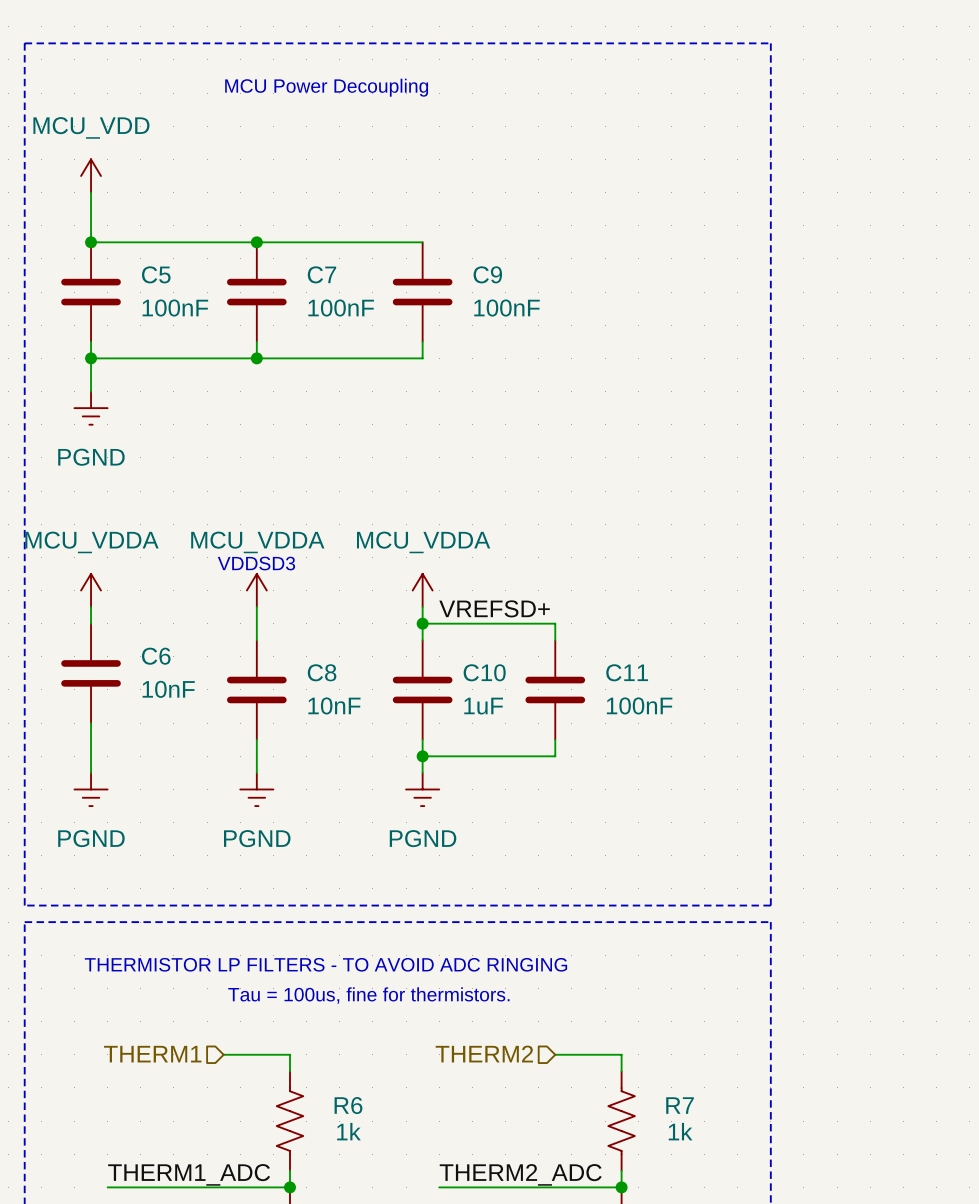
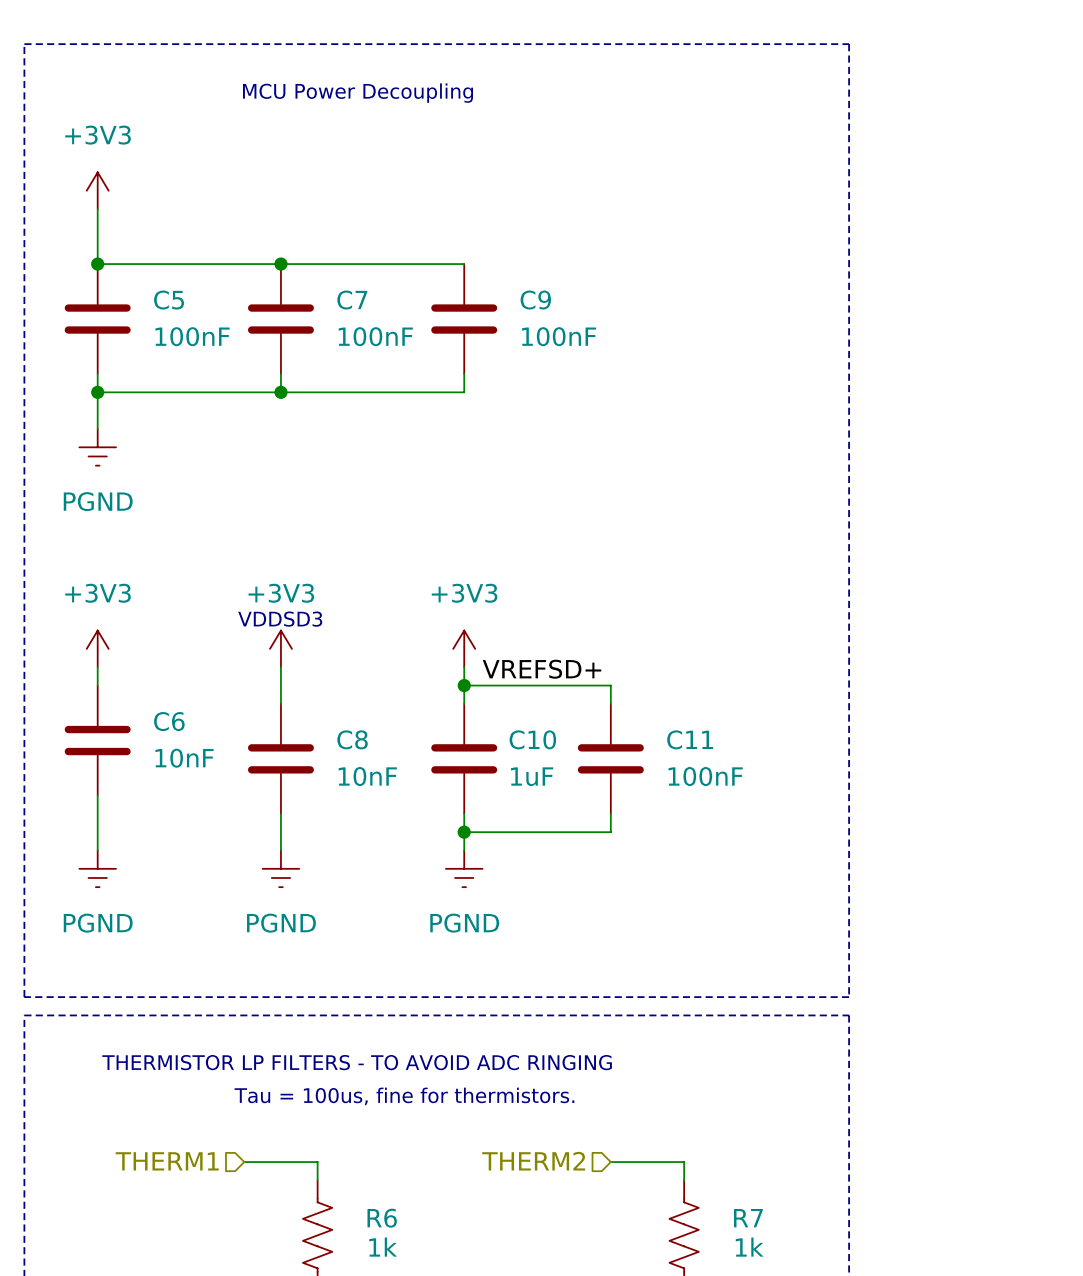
power symbol: MCU_VDD (91, 176) -> +3V3 (97, 190)
power symbol: MCU_VDDA (91, 590) -> +3V3 (97, 648)
power symbol: MCU_VDDA (256, 590) -> +3V3 (280, 648)
power symbol: MCU_VDDA (422, 590) -> +3V3 (464, 648)

